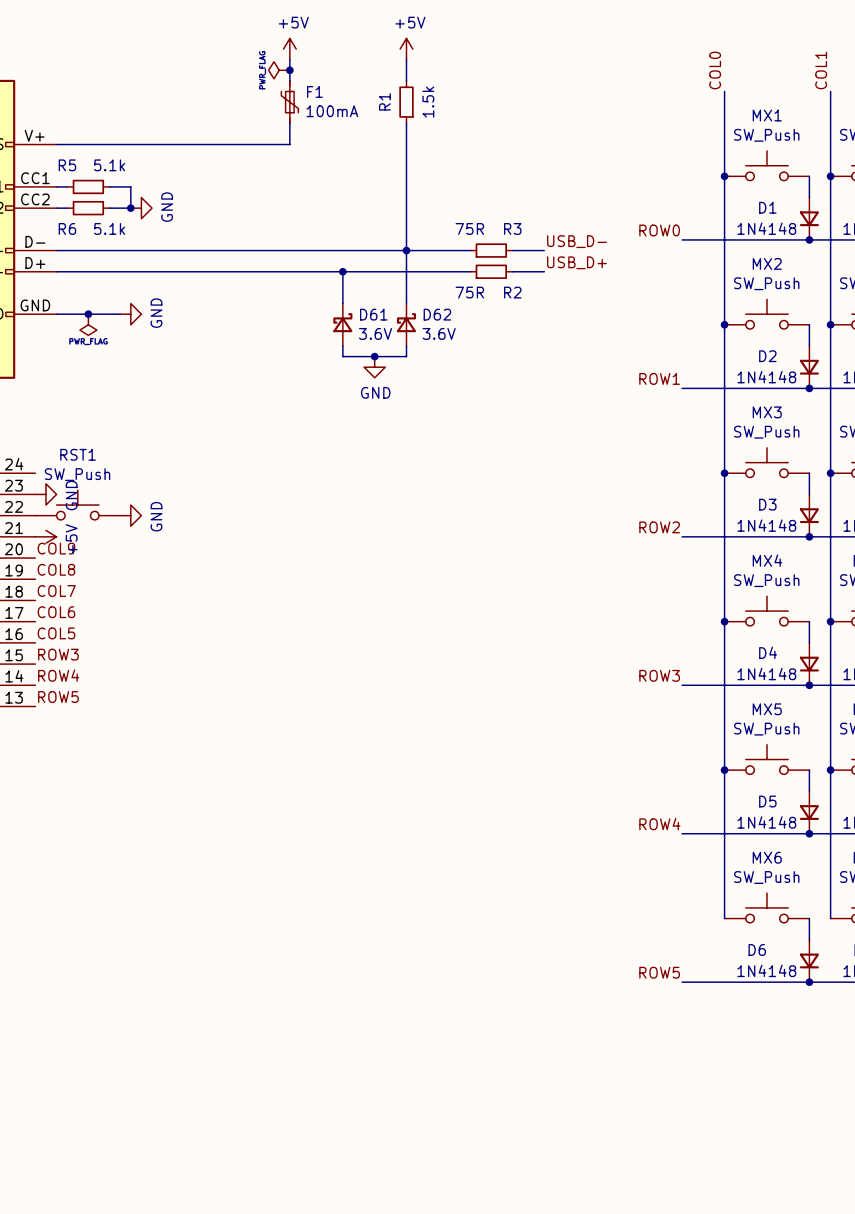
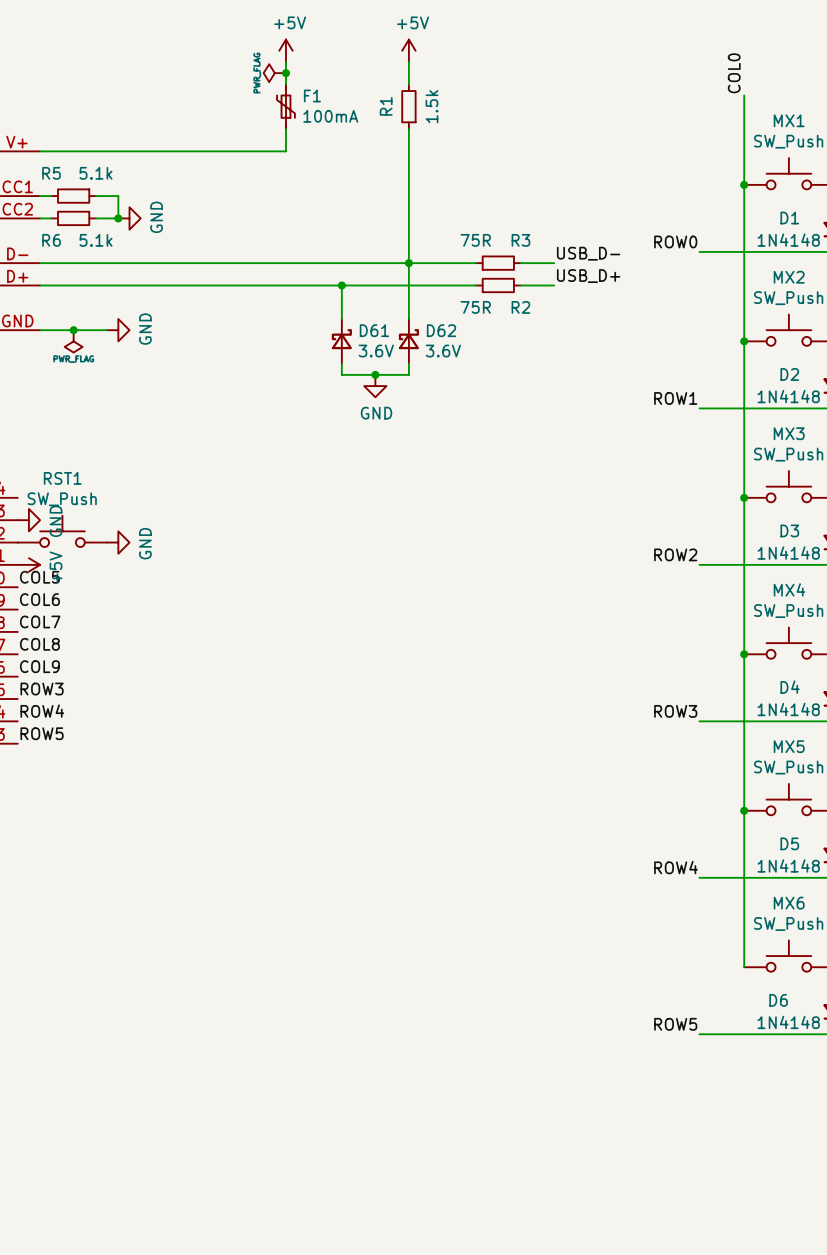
label: COL9 (56, 548) -> COL5 (39, 577)
label: COL8 (56, 569) -> COL6 (39, 599)
label: COL6 (56, 612) -> COL8 (39, 644)
label: COL5 (56, 633) -> COL9 (39, 666)

